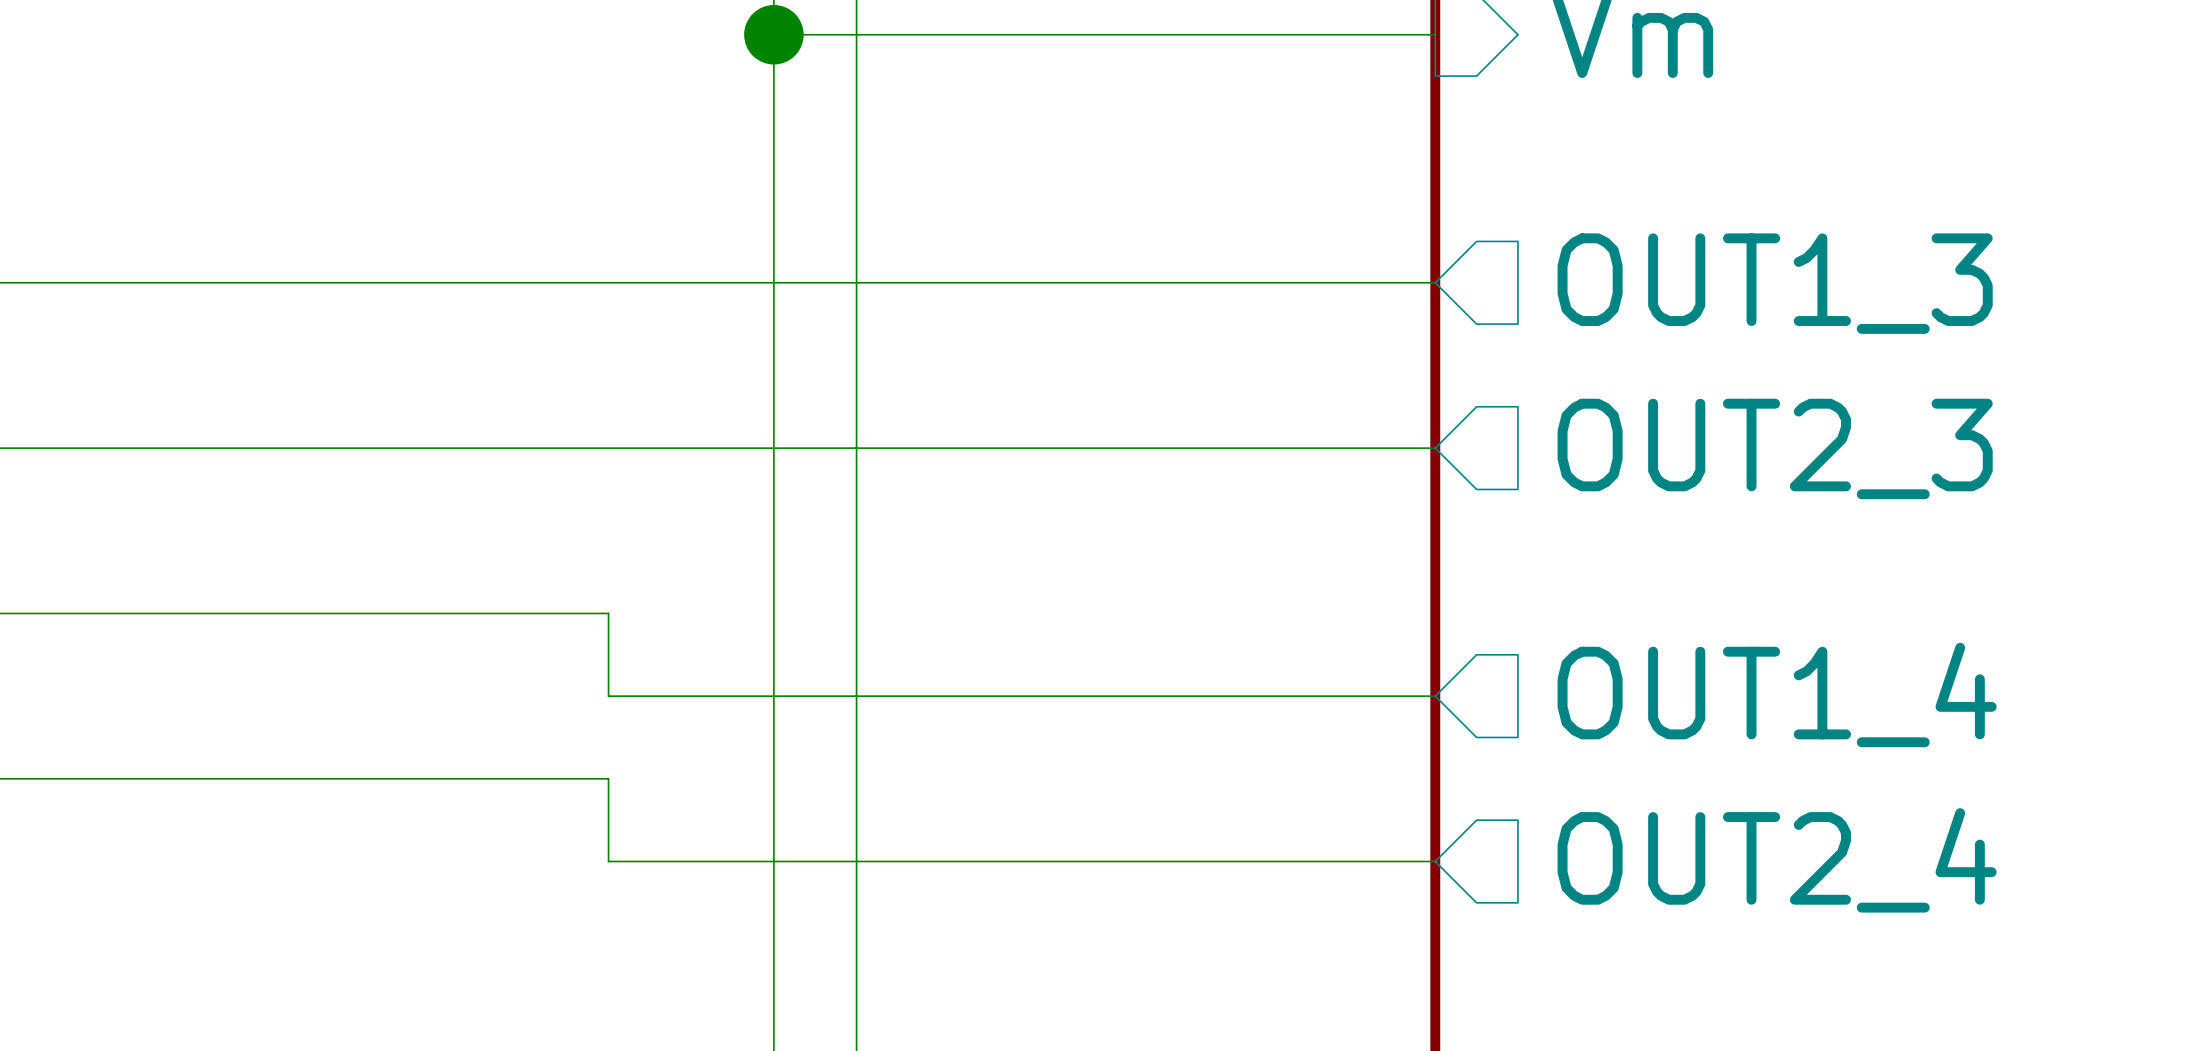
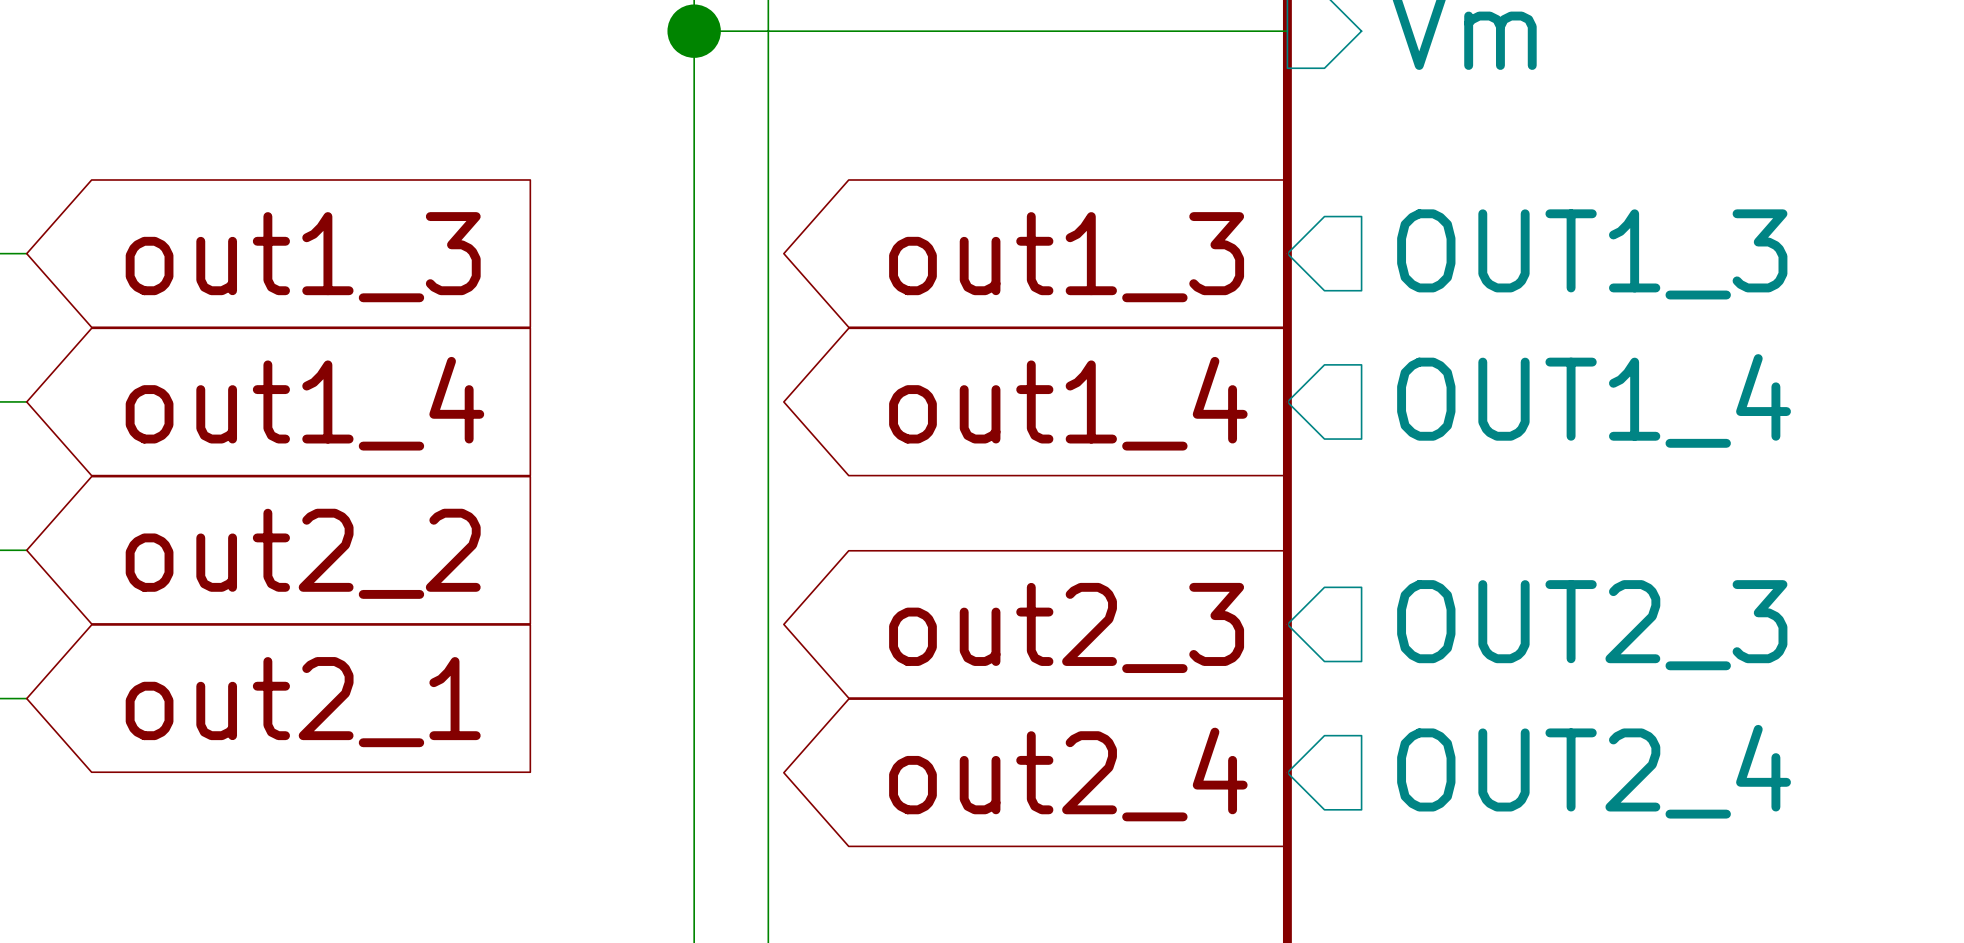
wire: (29, 282) (1435, 282) -> none
global label: none -> out1_3 (303, 257)
global label: none -> out1_3 (1066, 257)
wire: (29, 448) (1435, 448) -> none
sheet pin: OUT2_3 (1775, 448) -> OUT1_4 (1594, 400)
global label: none -> out1_4 (304, 403)
global label: none -> out1_4 (1068, 403)
wire: (29, 613) (608, 613) (608, 696) (1435, 696) -> none
global label: none -> out2_2 (303, 553)
sheet pin: OUT1_4 (1777, 695) -> OUT2_3 (1592, 625)
global label: none -> out2_3 (1066, 627)
wire: (29, 778) (608, 778) (608, 861) (1435, 861) -> none
global label: none -> out2_1 (303, 702)
global label: none -> out2_4 (1068, 774)

